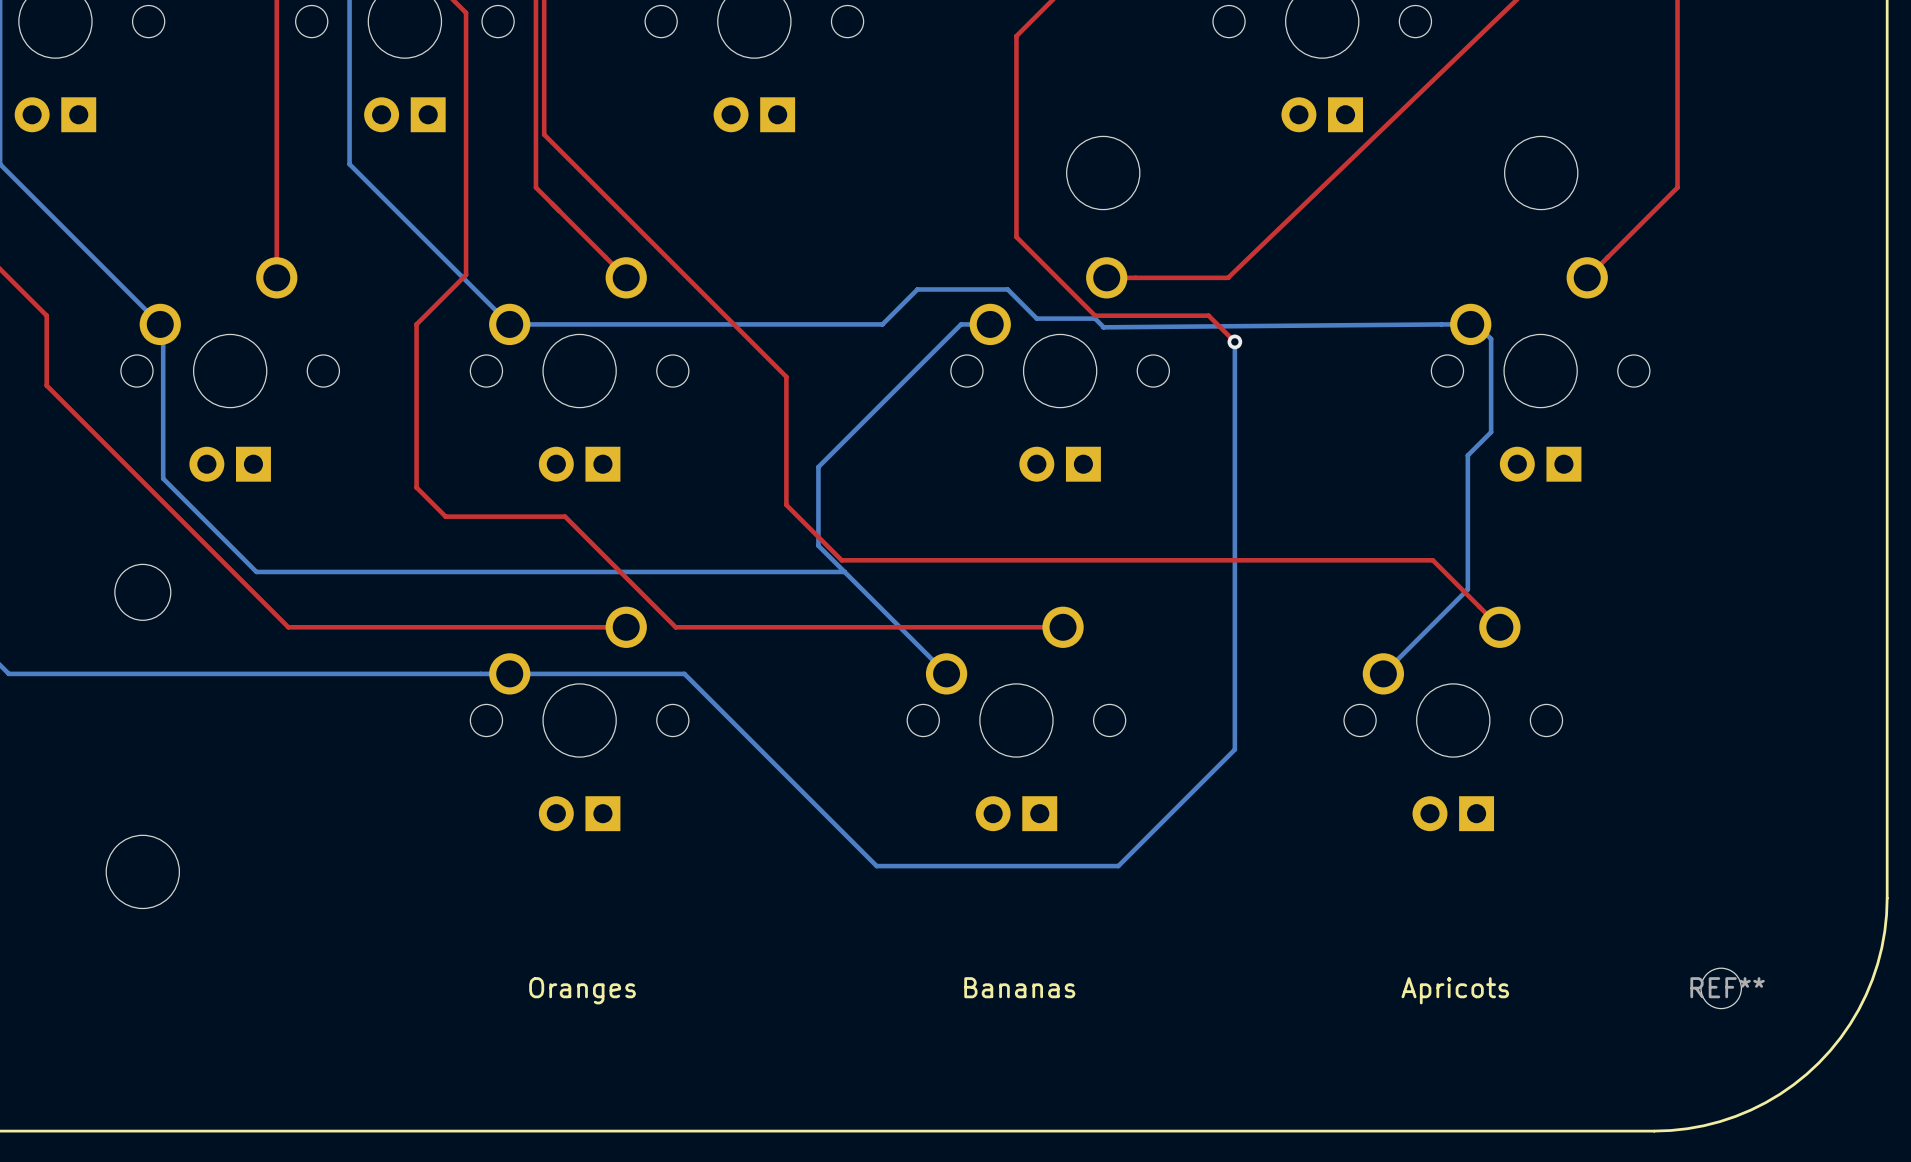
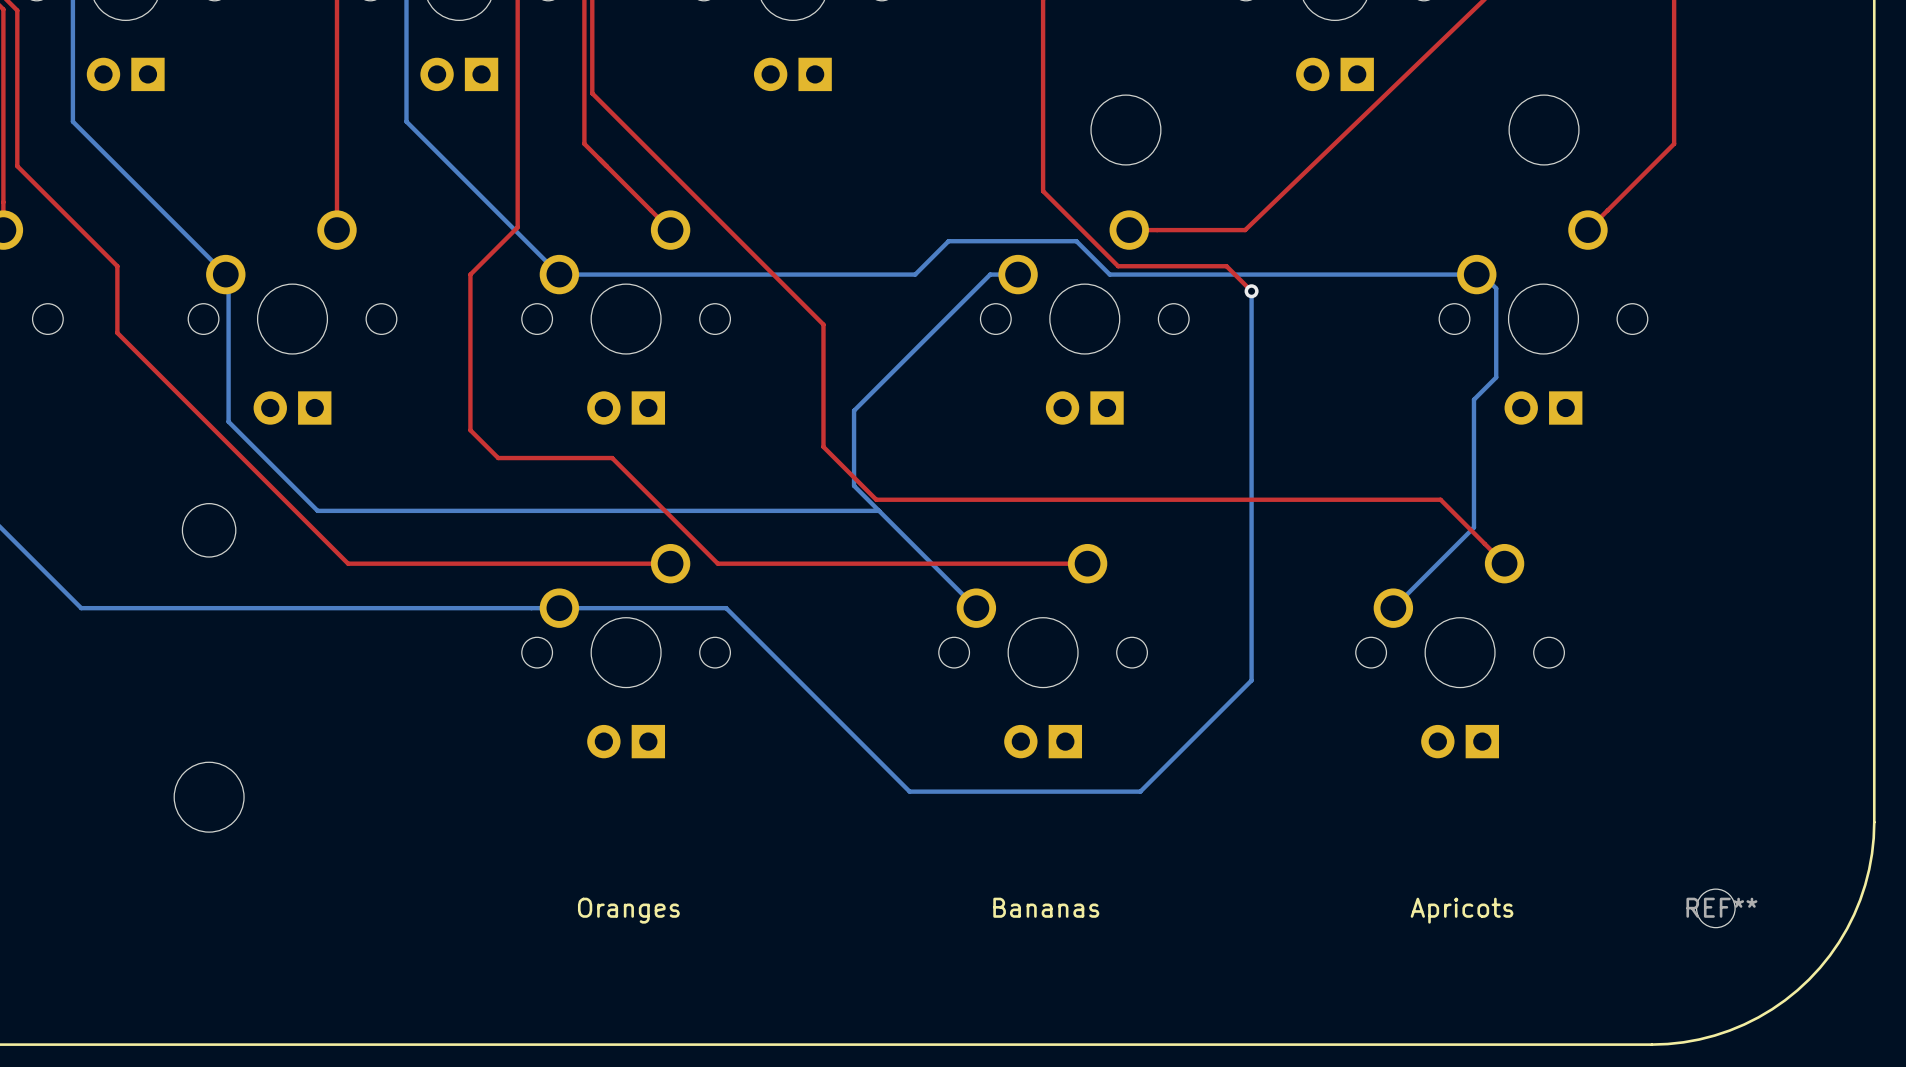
bottom track: (1007, 289) (1036, 318) (1095, 318) (1103, 327) -> none
bottom track: (1441, 324) (1103, 327) -> (1448, 274) (1109, 274) (1076, 241) (1034, 241)

